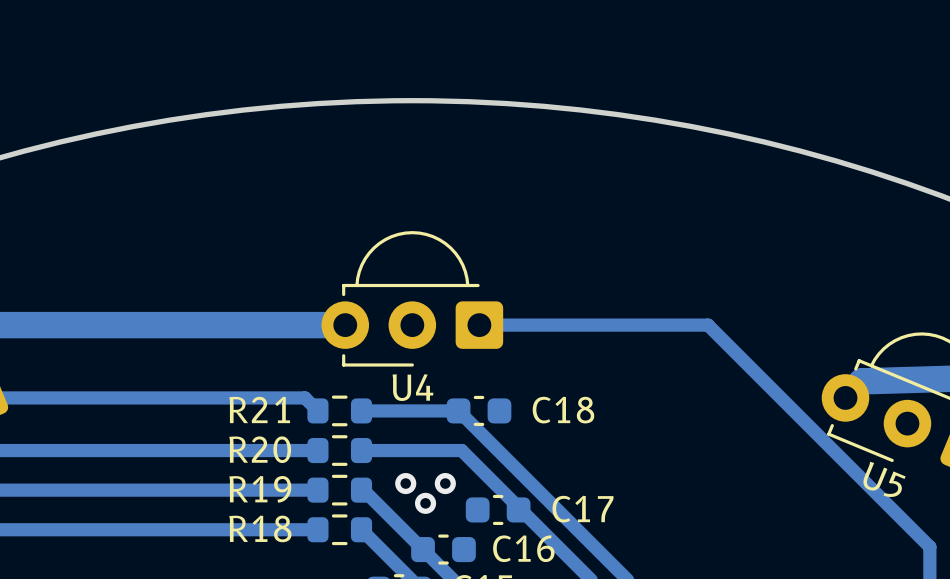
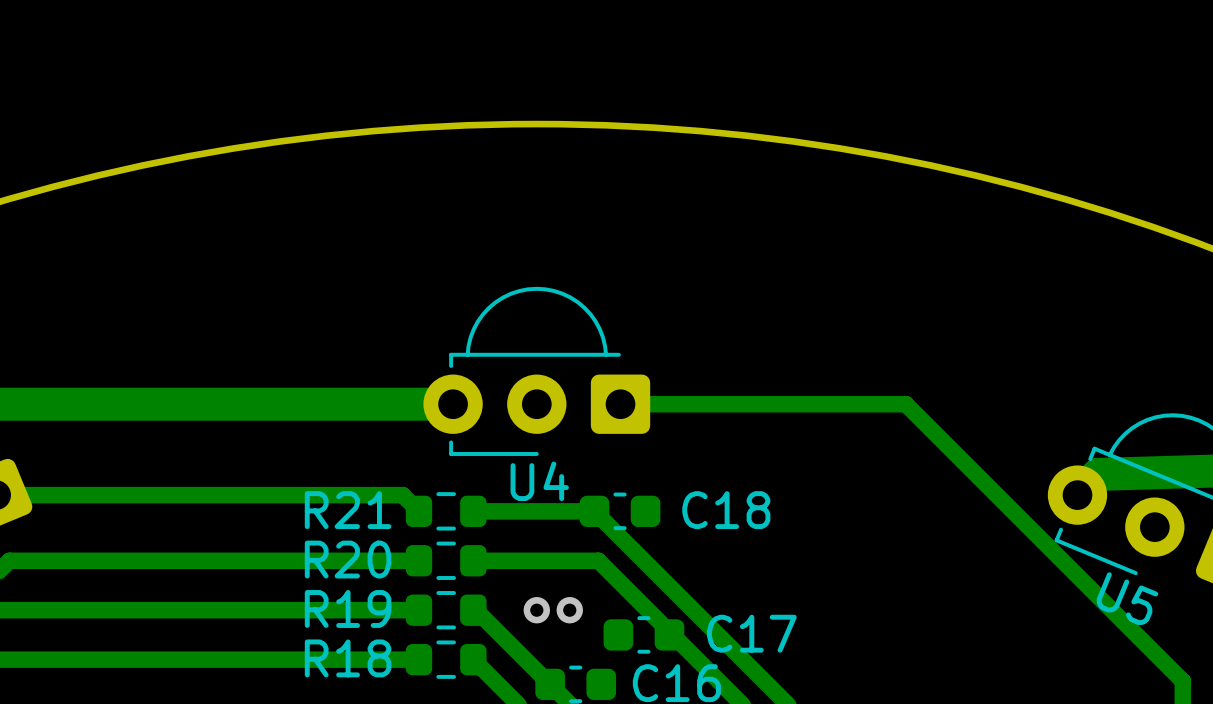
via: (405, 483) -> none
via: (445, 483) -> none
via: none -> (536, 610)
via: none -> (569, 610)
via: (425, 503) -> none

